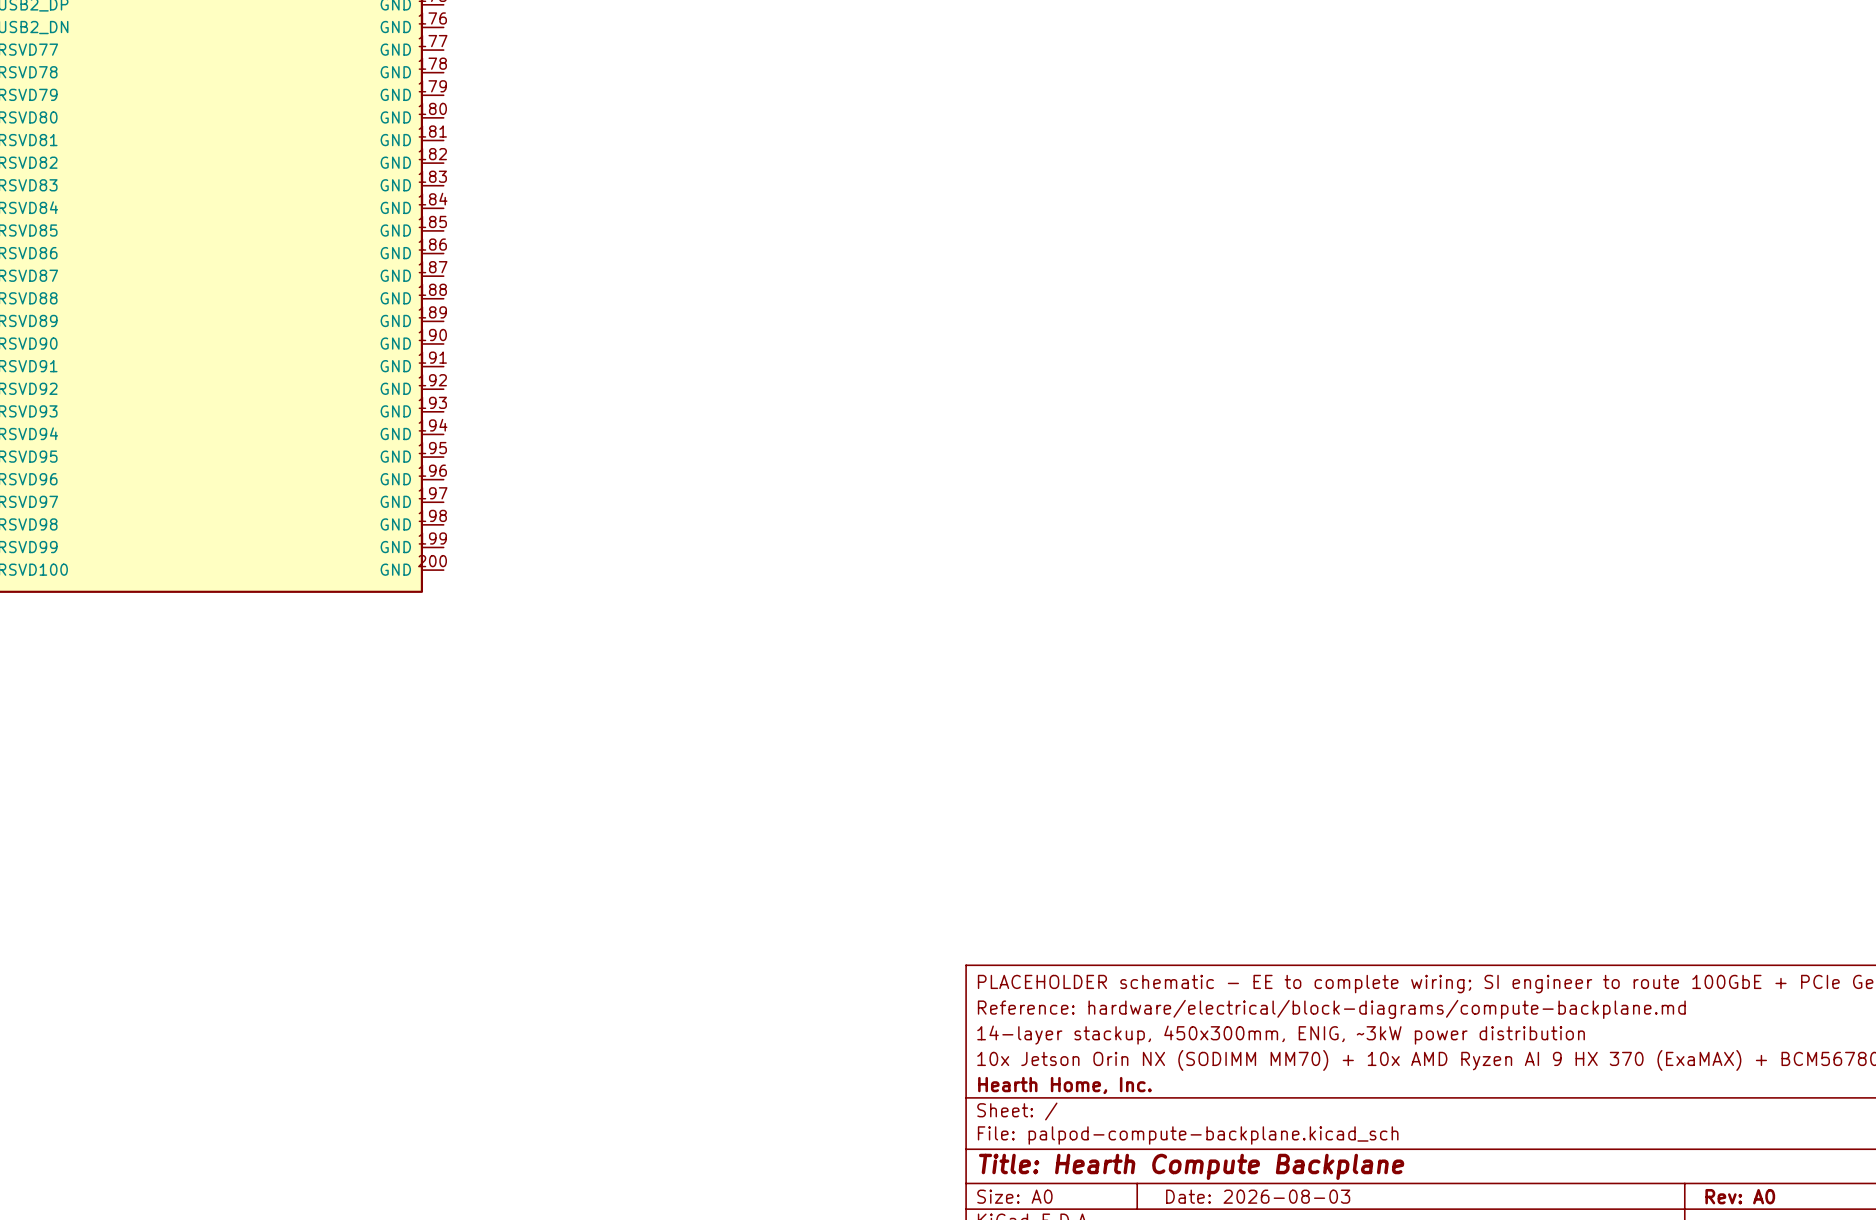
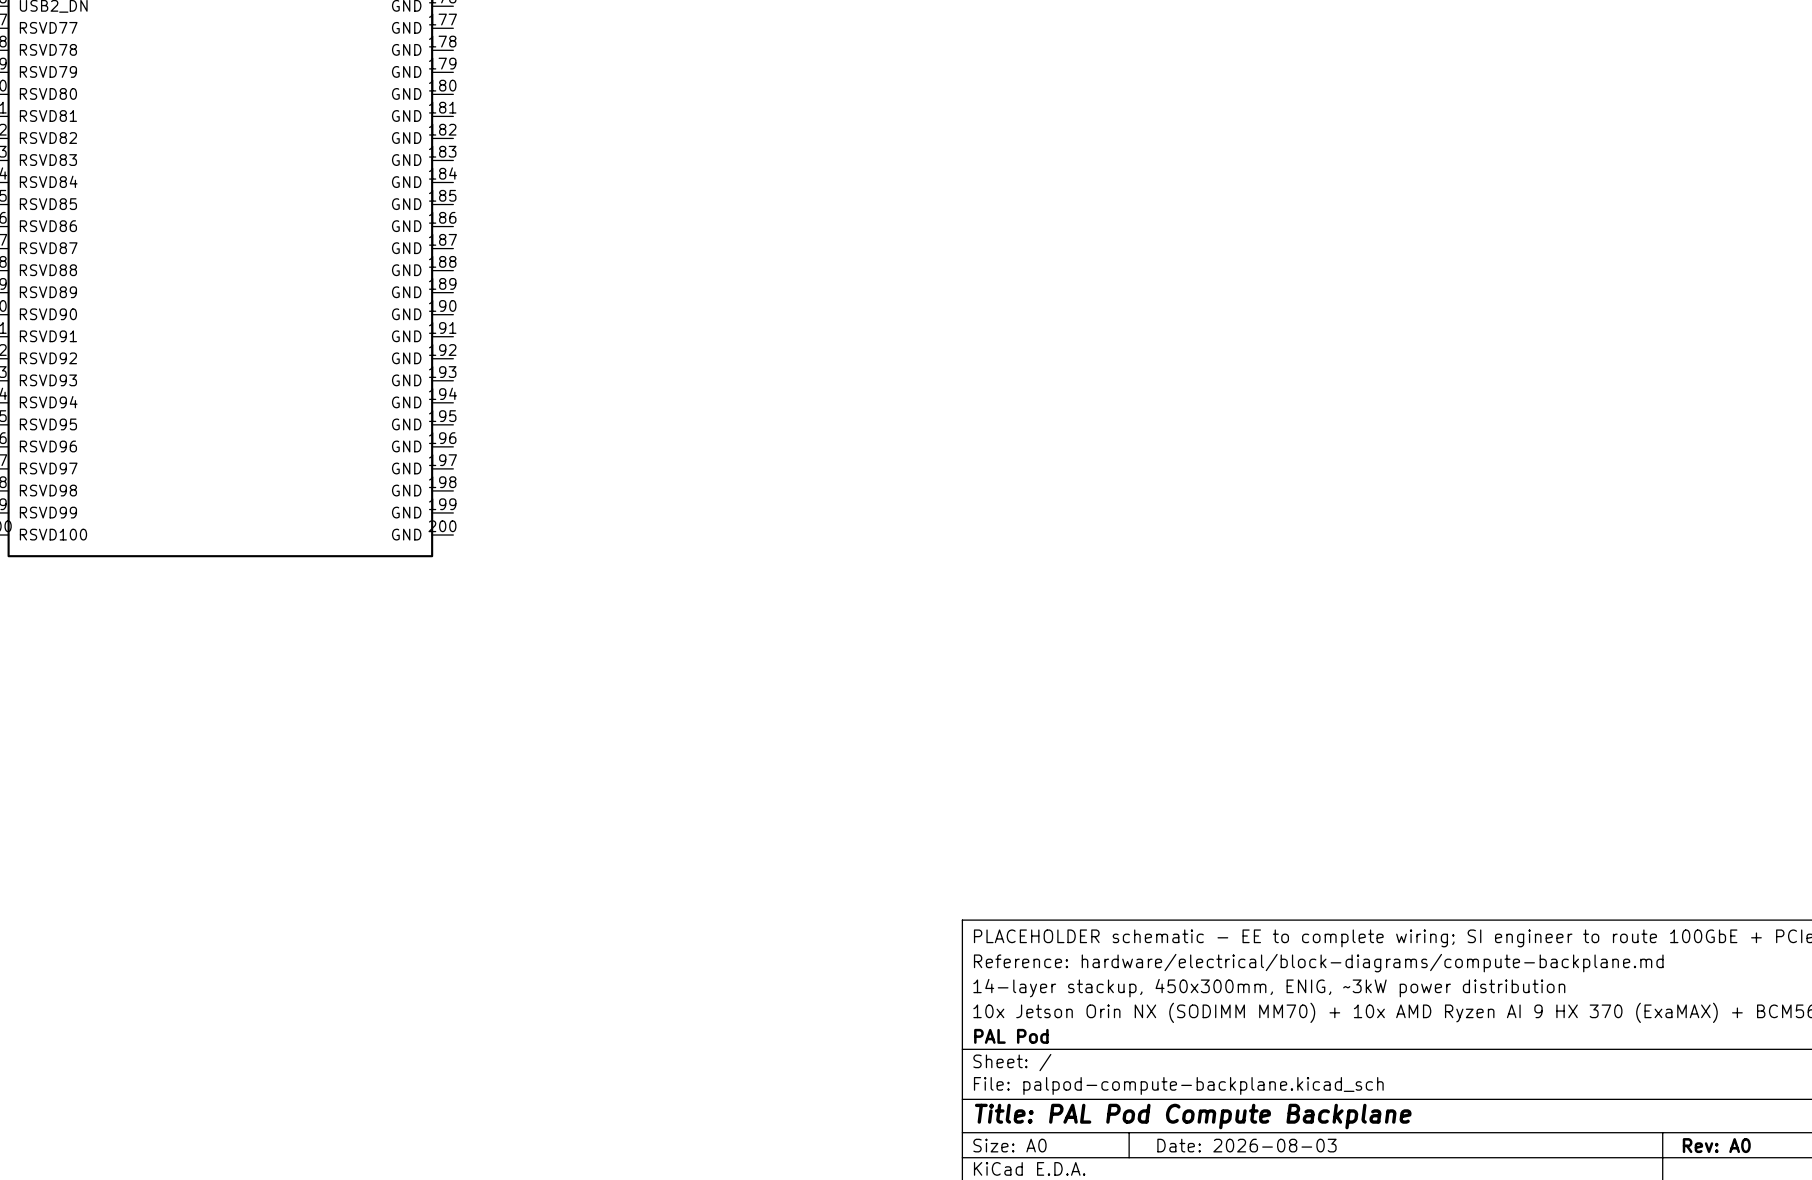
title block: Hearth Home, Inc. (1064, 1085) -> PAL Pod (1011, 1036)
title block: Title: Hearth Compute Backplane (1191, 1166) -> Title: PAL Pod Compute Backplane (1193, 1116)

